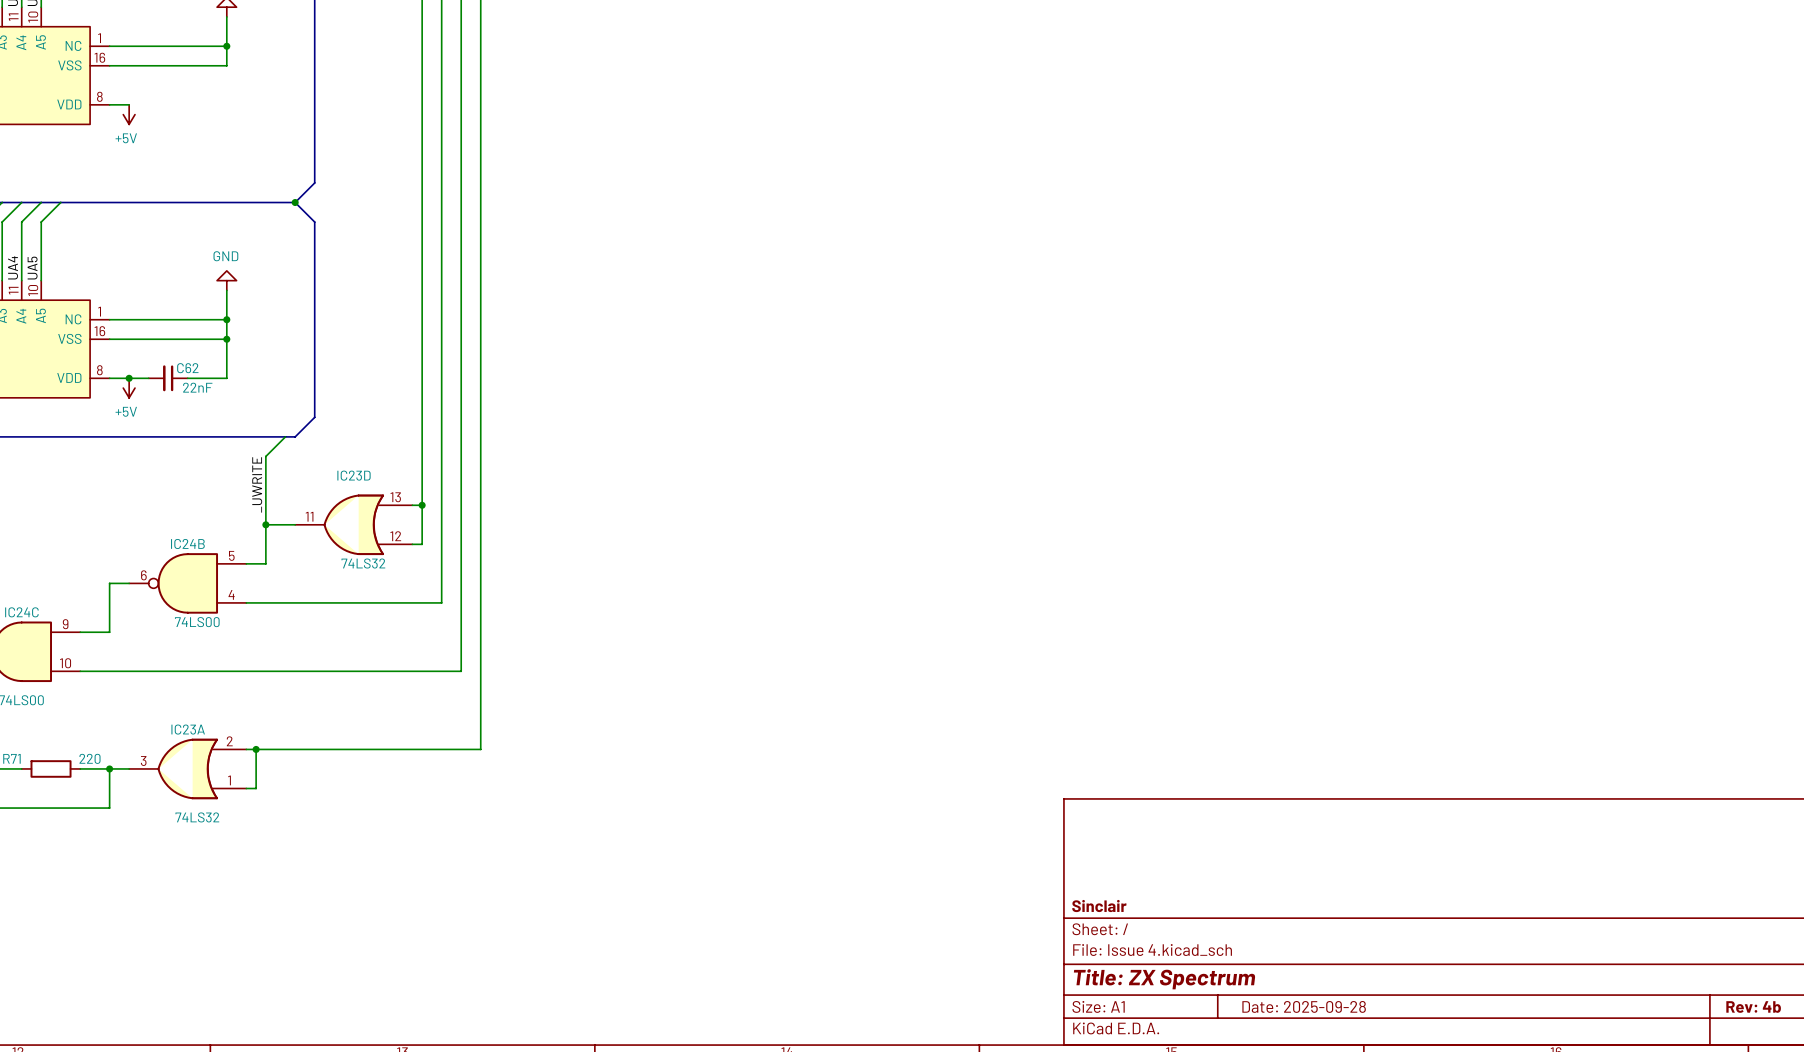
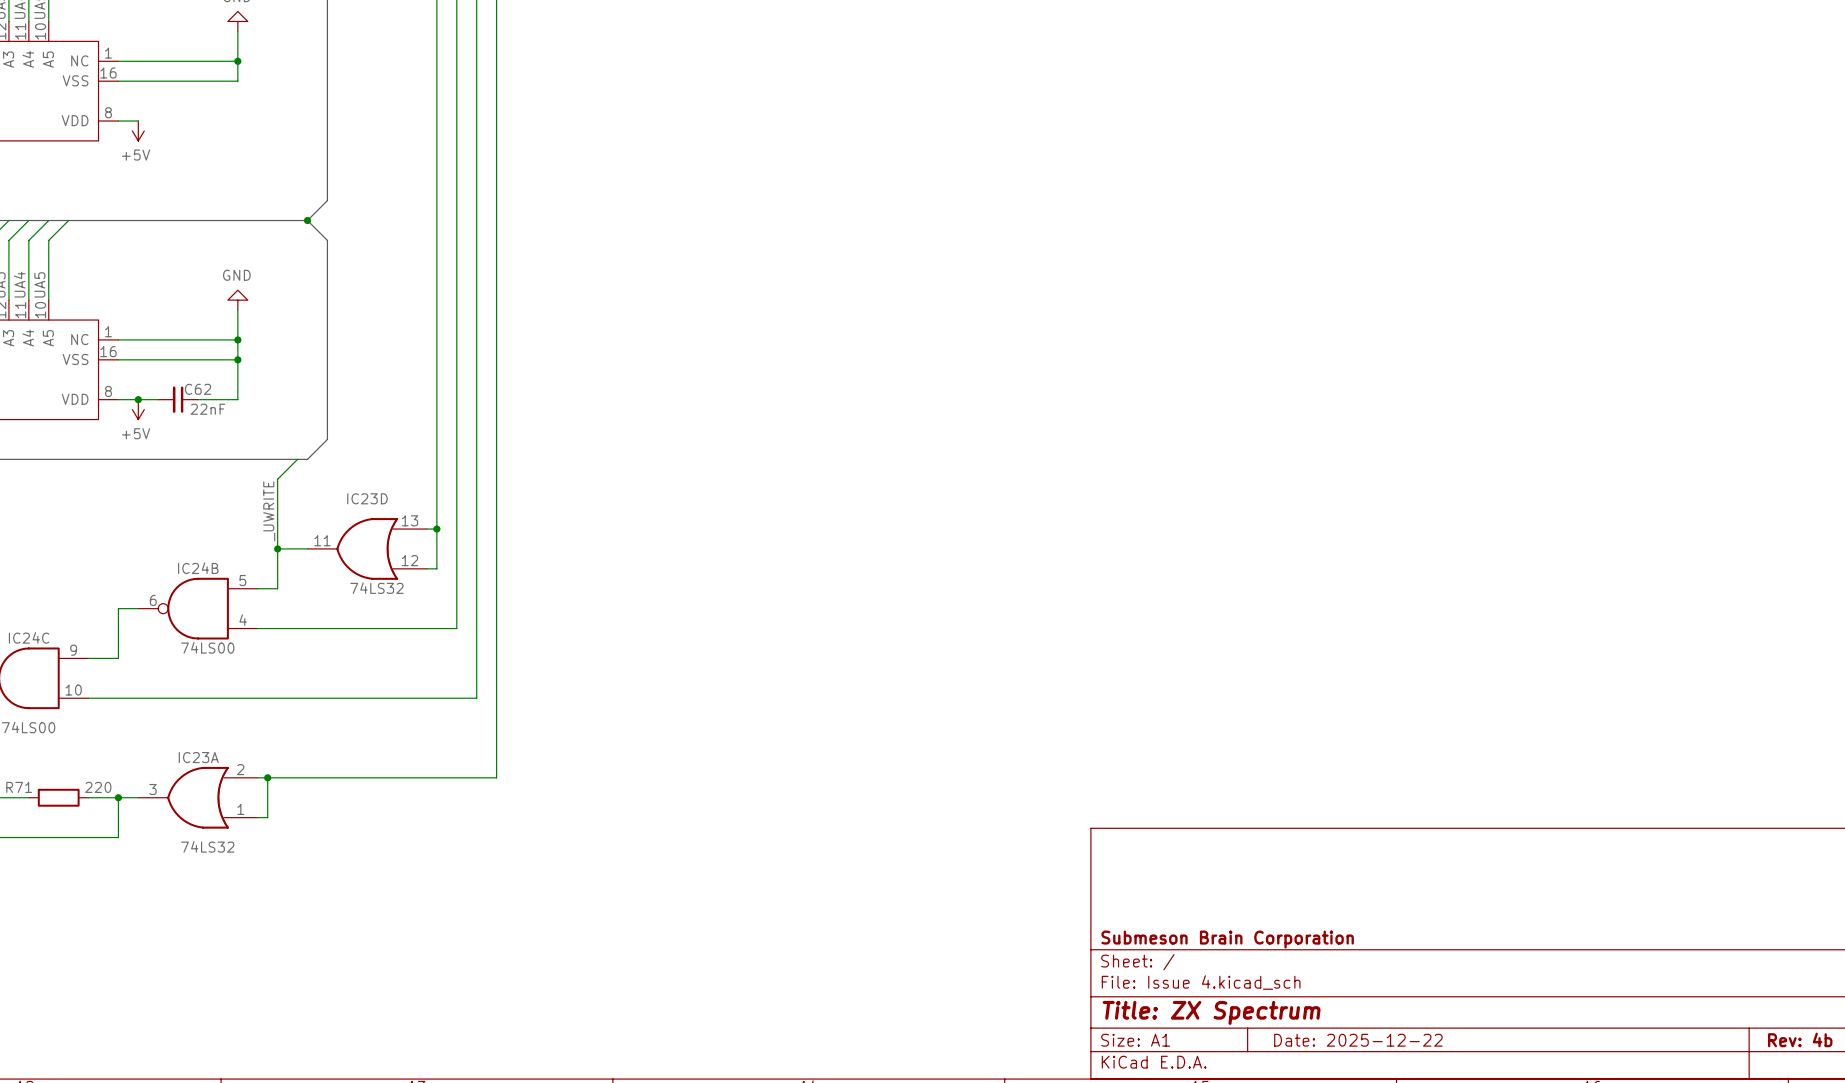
title block: Sinclair (1099, 906) -> Submeson Brain Corporation (1227, 939)
title block: Date: 2025-09-28 (1304, 1006) -> Date: 2025-12-22 (1358, 1040)

